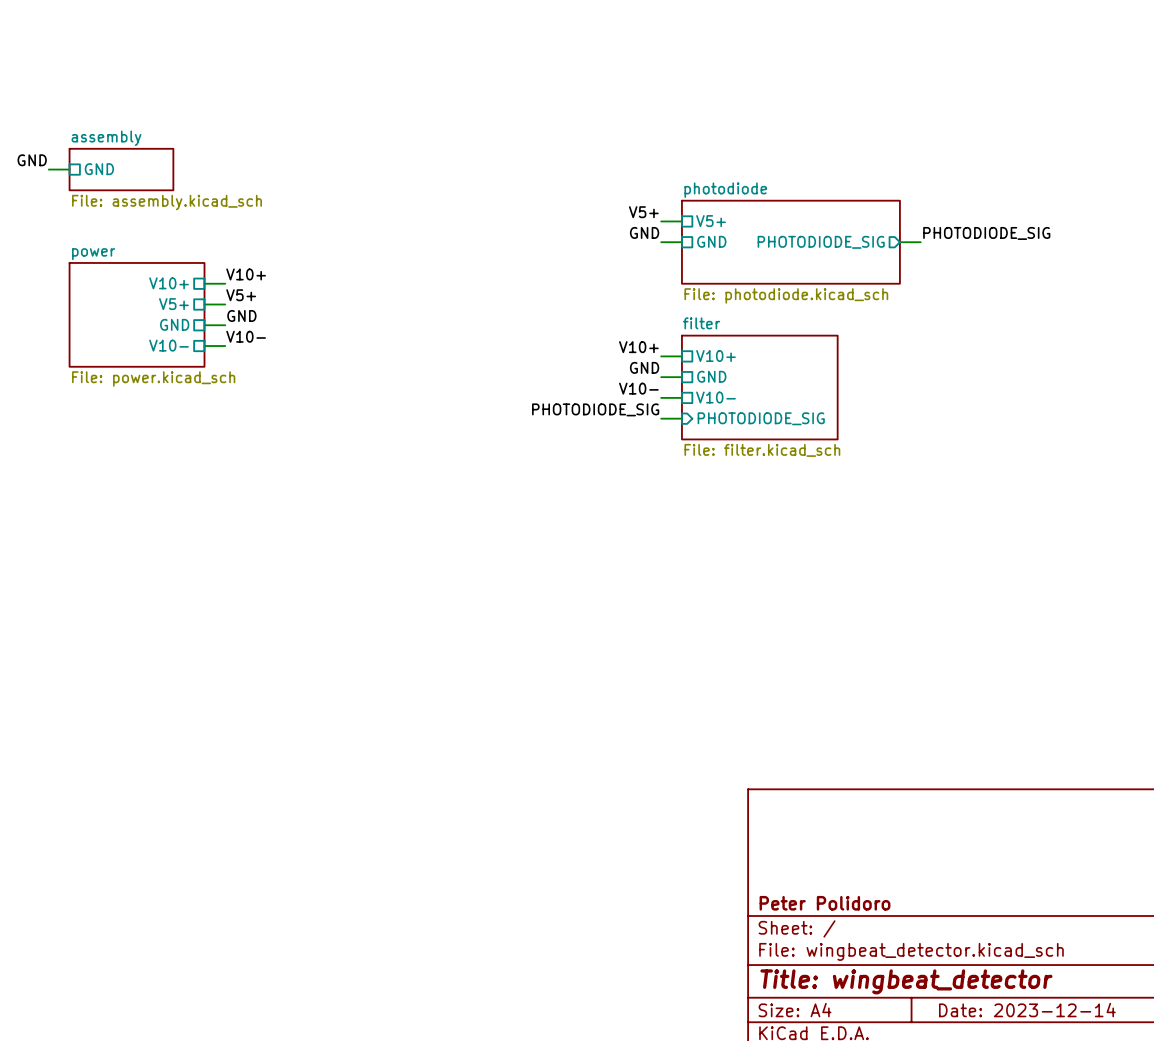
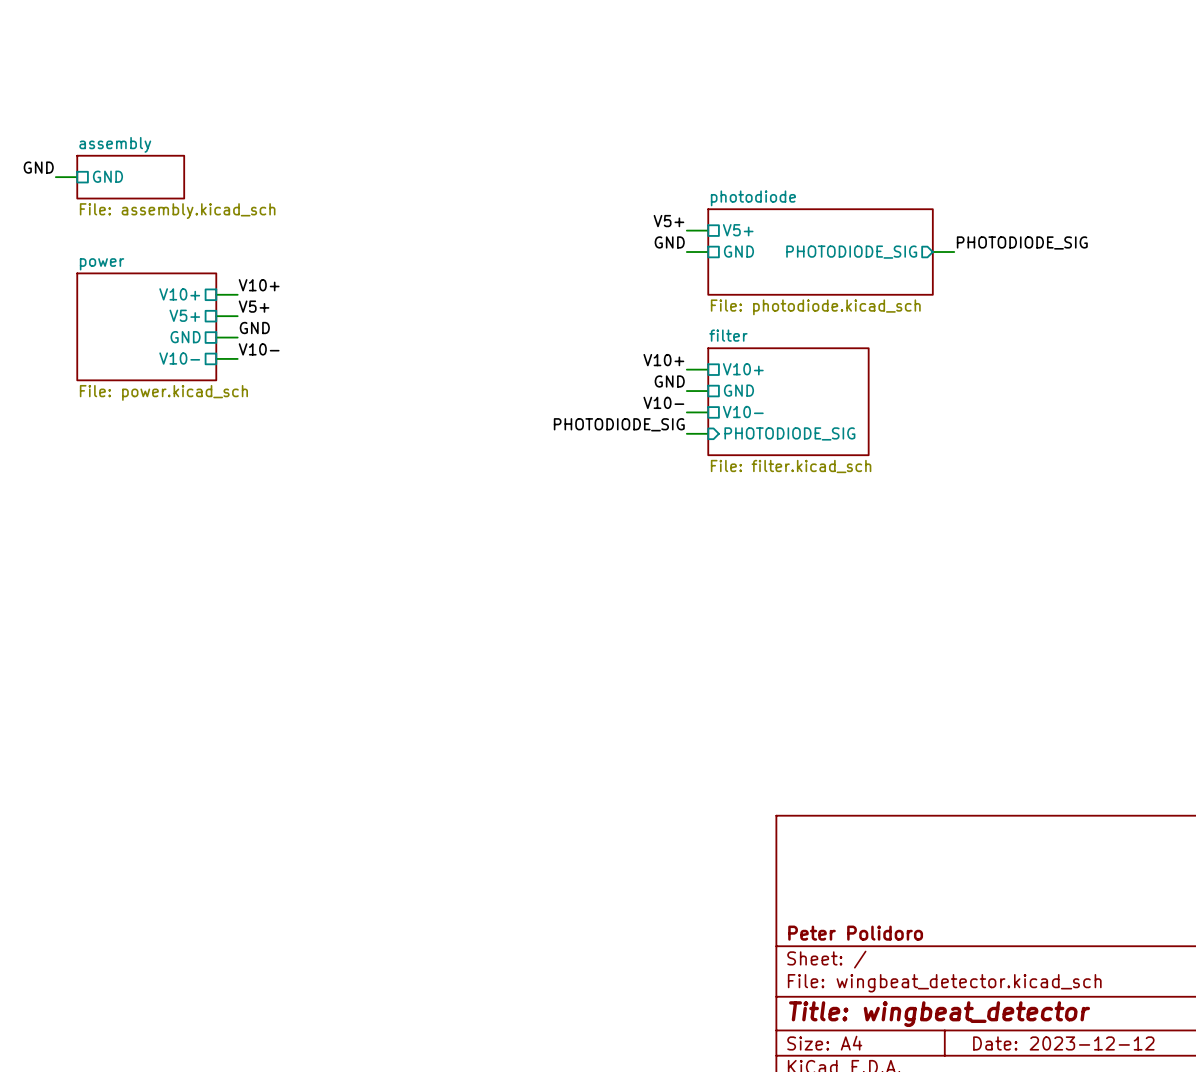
title block: Date: 2023-12-14 (1027, 1010) -> Date: 2023-12-12 (1063, 1043)

